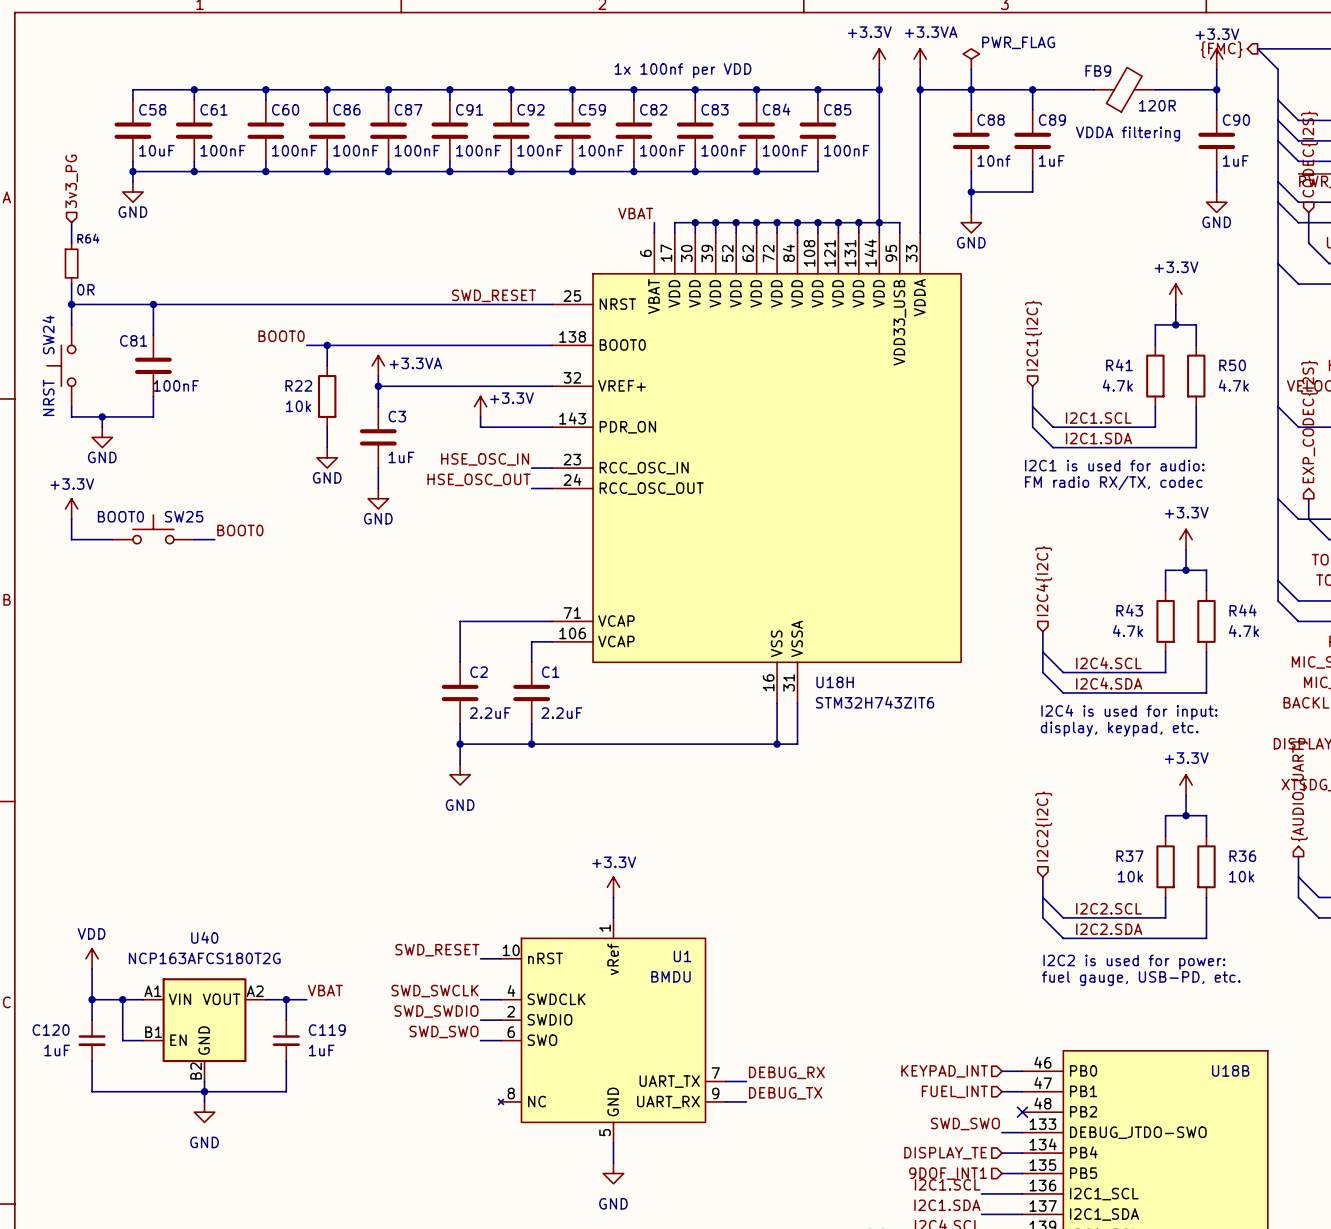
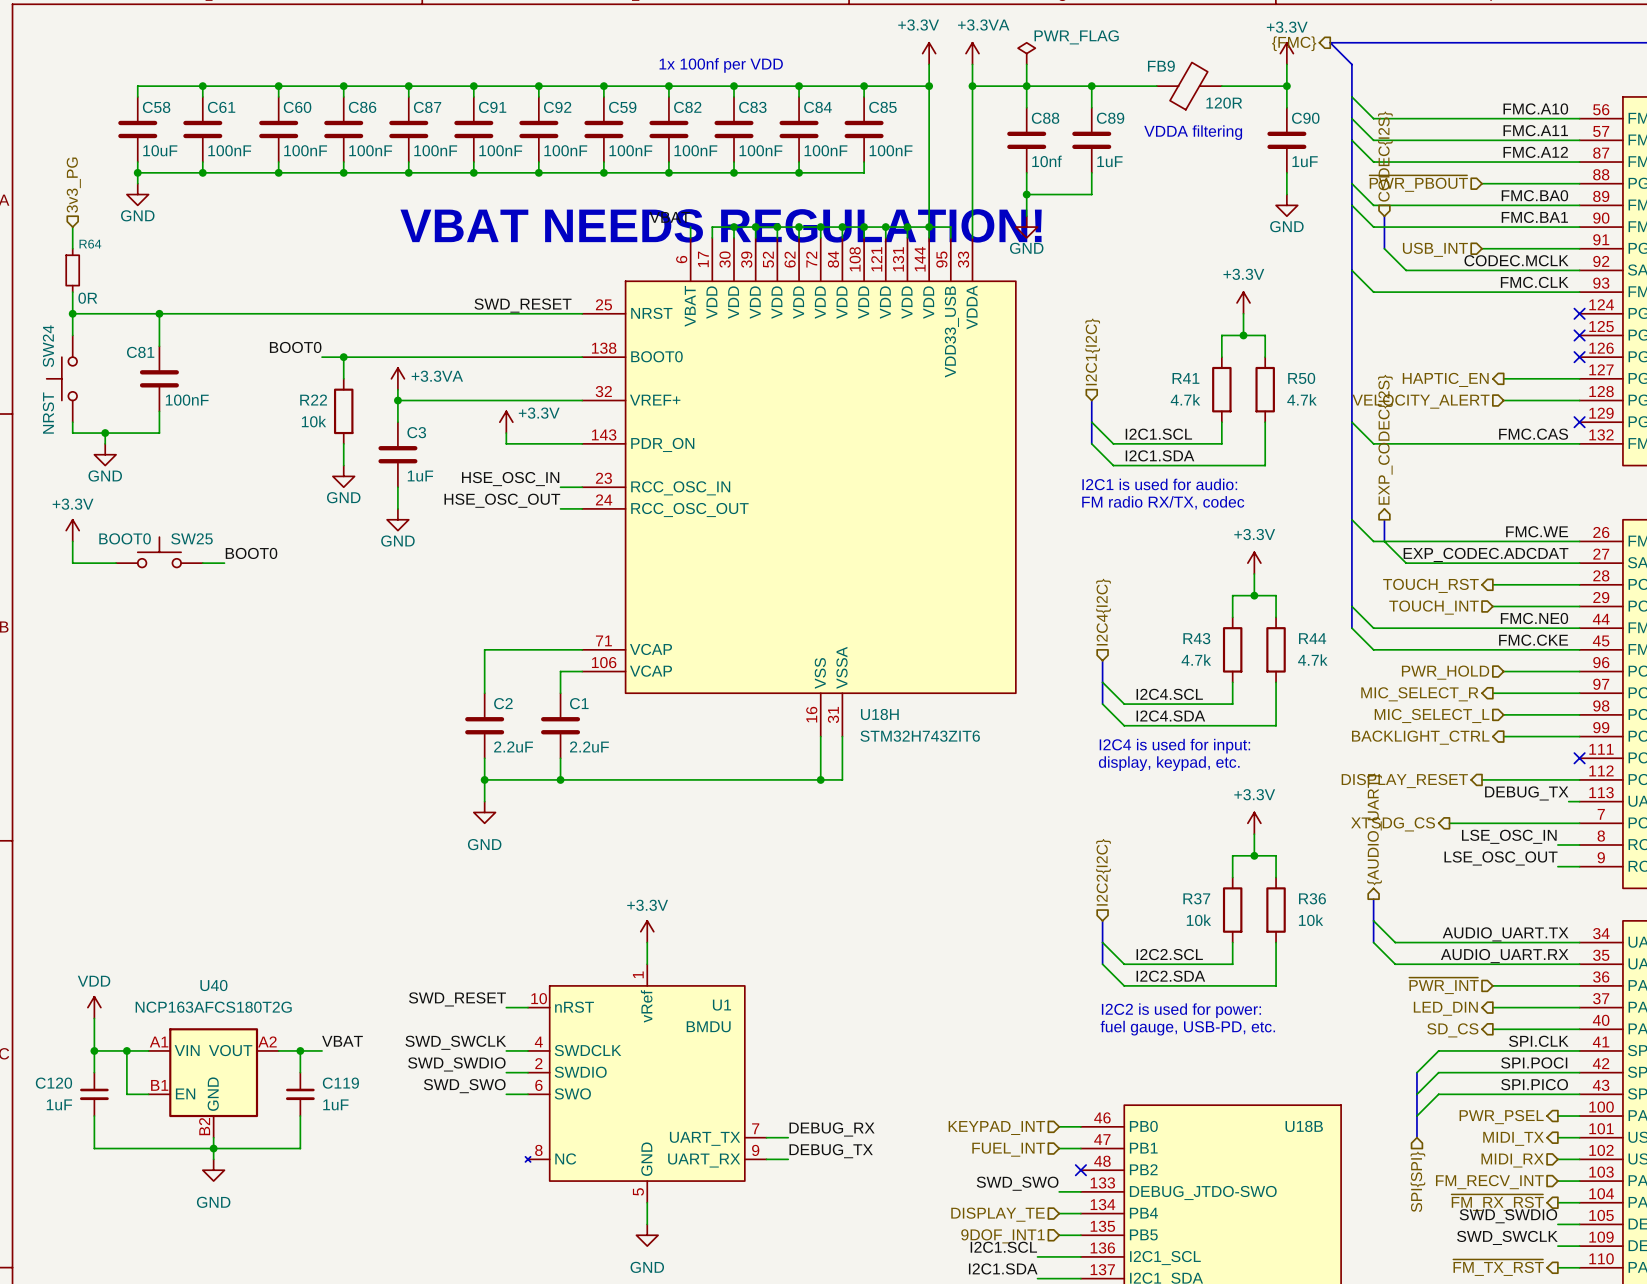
text: none -> VBAT NEEDS REGULATION! (721, 225)

